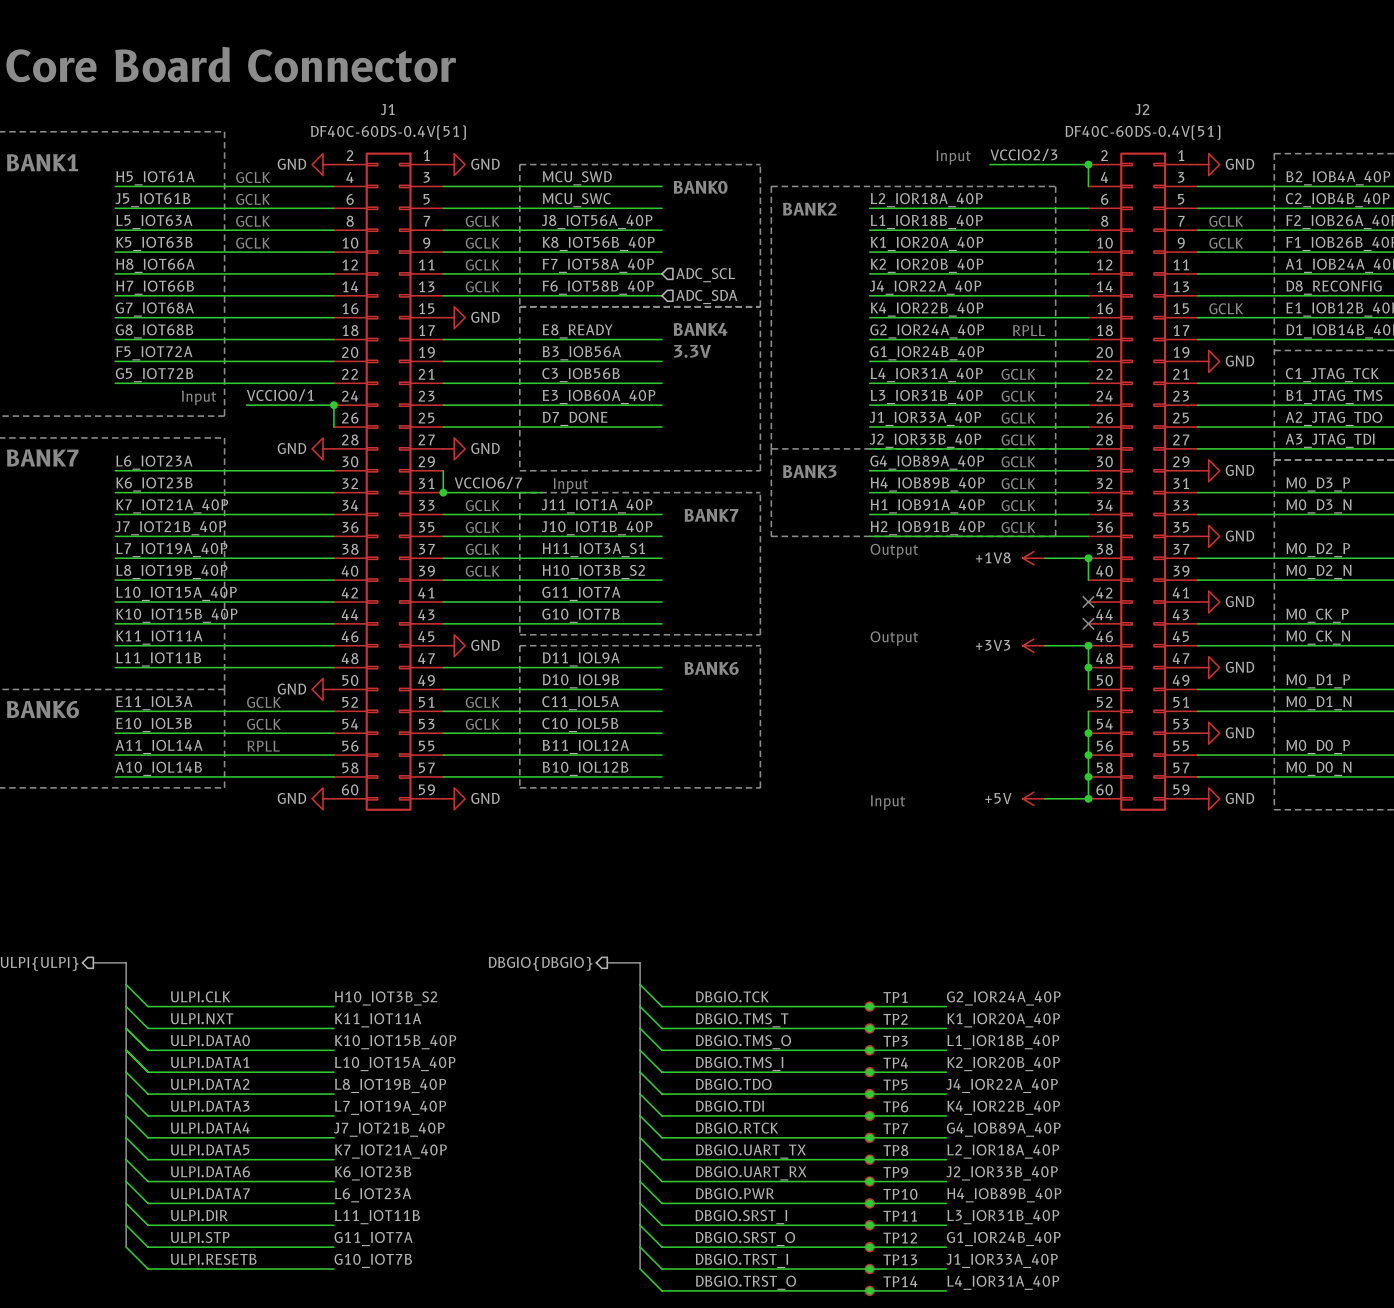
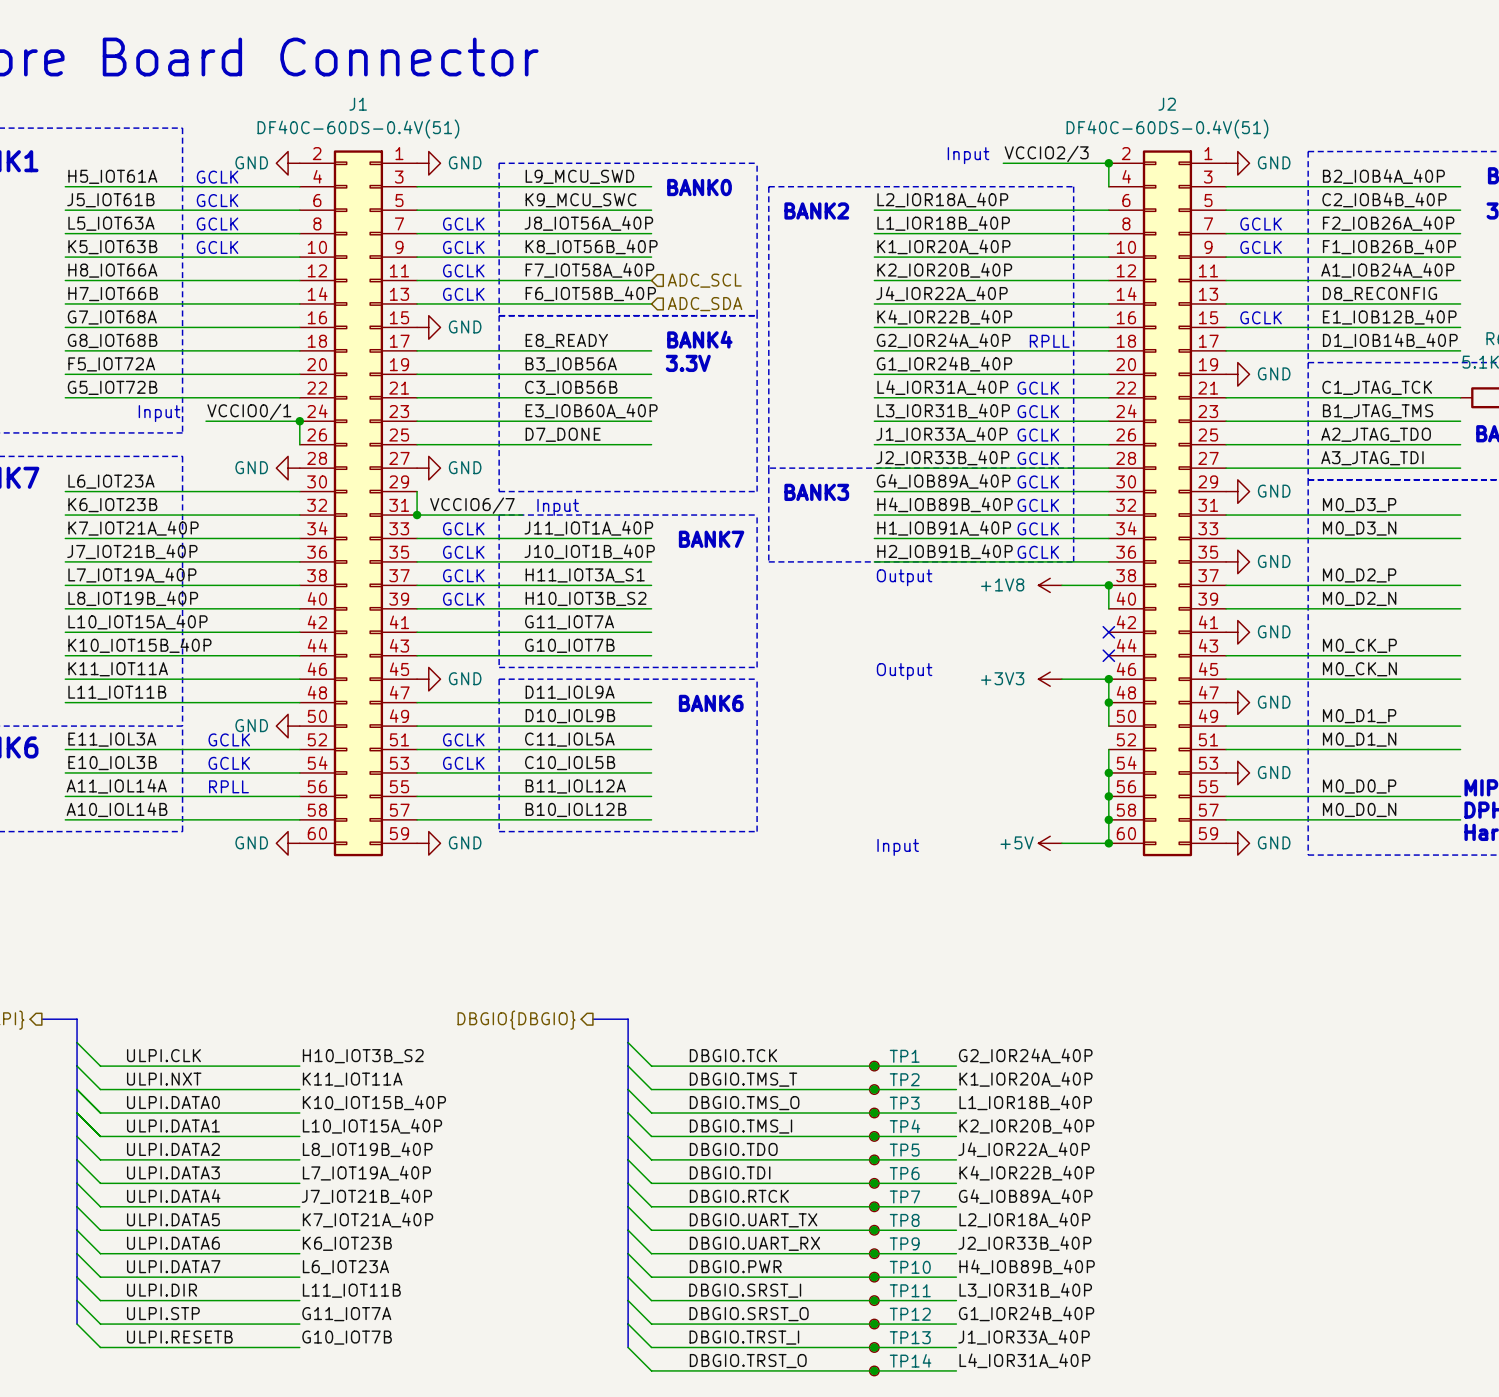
label: MCU_SWD (577, 178) -> L9_MCU_SWD (579, 176)
label: MCU_SWC (576, 200) -> K9_MCU_SWC (581, 200)

